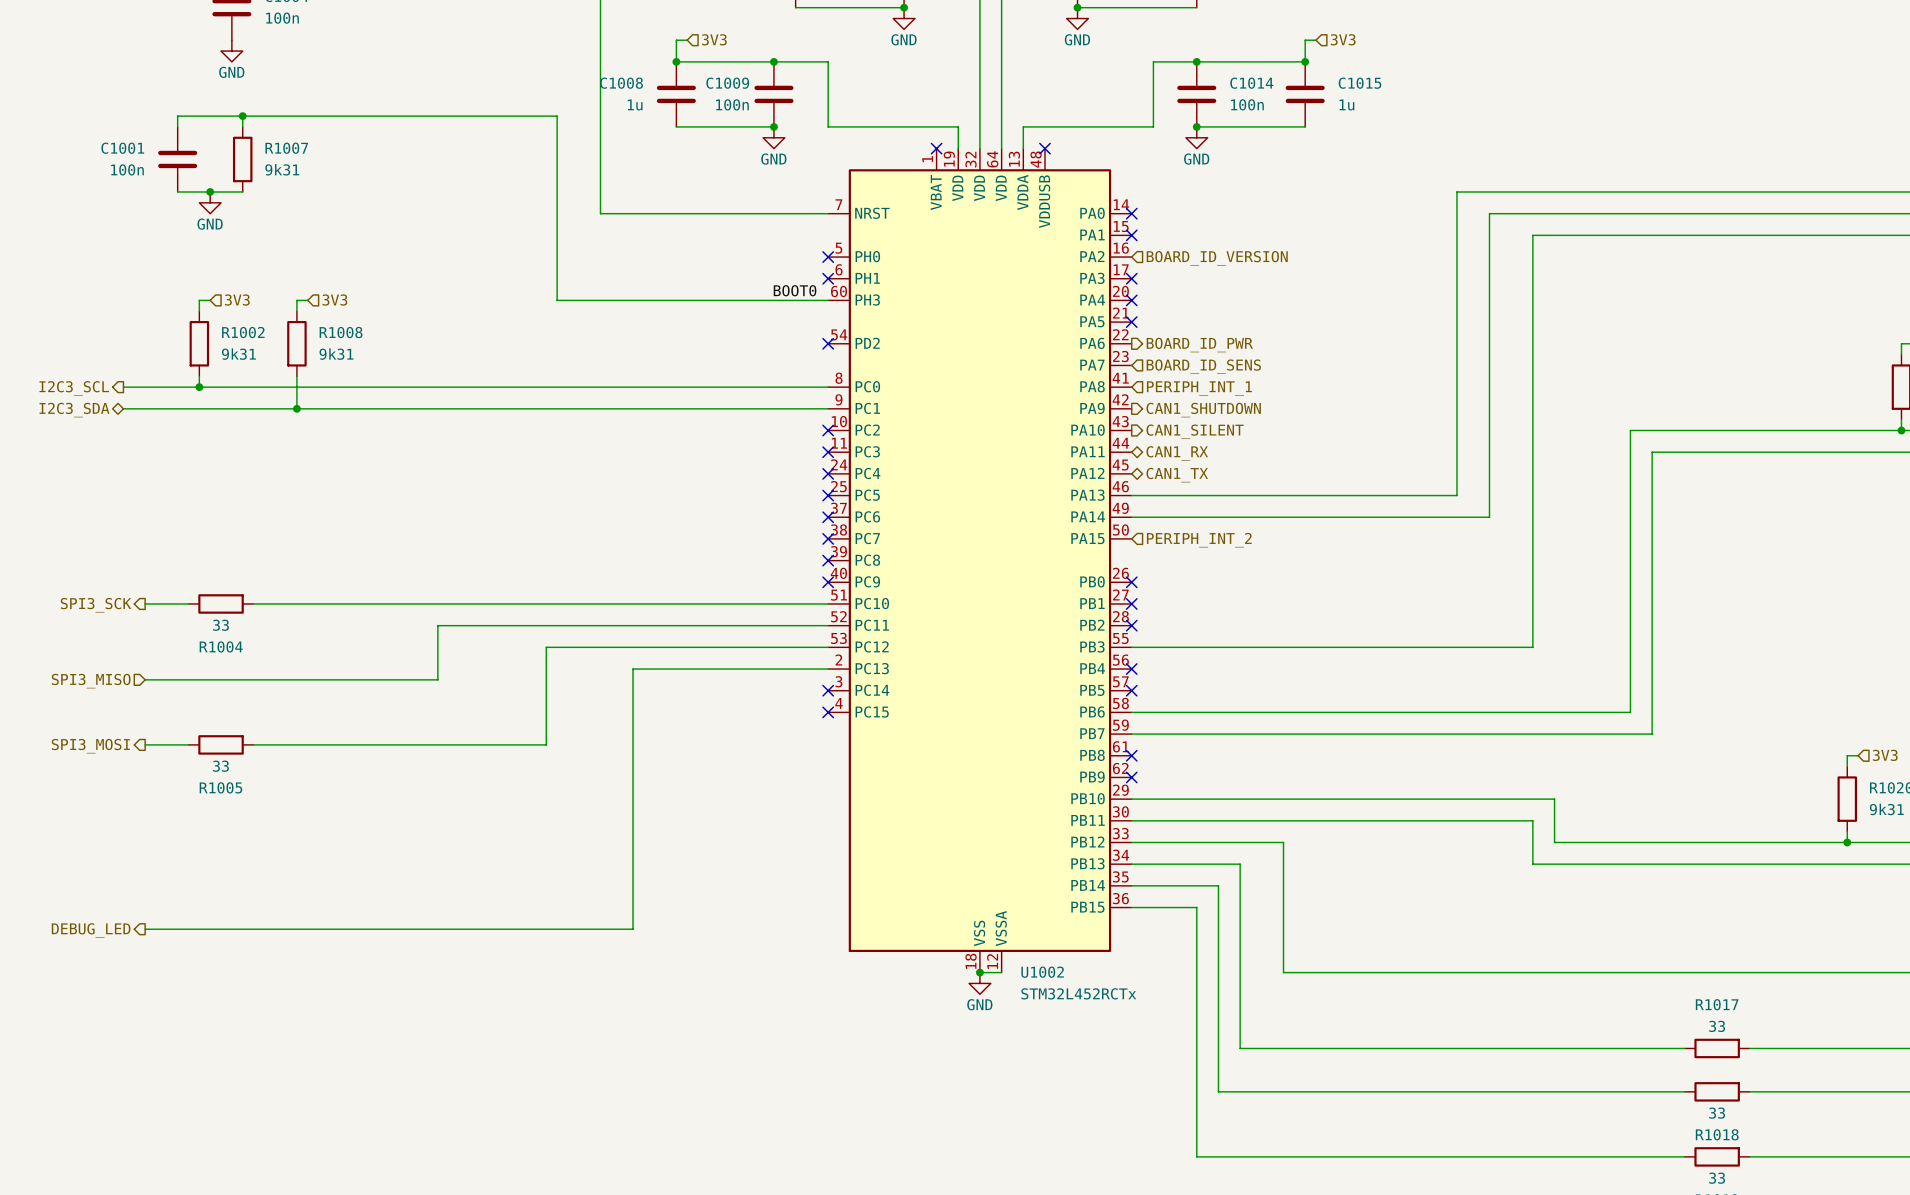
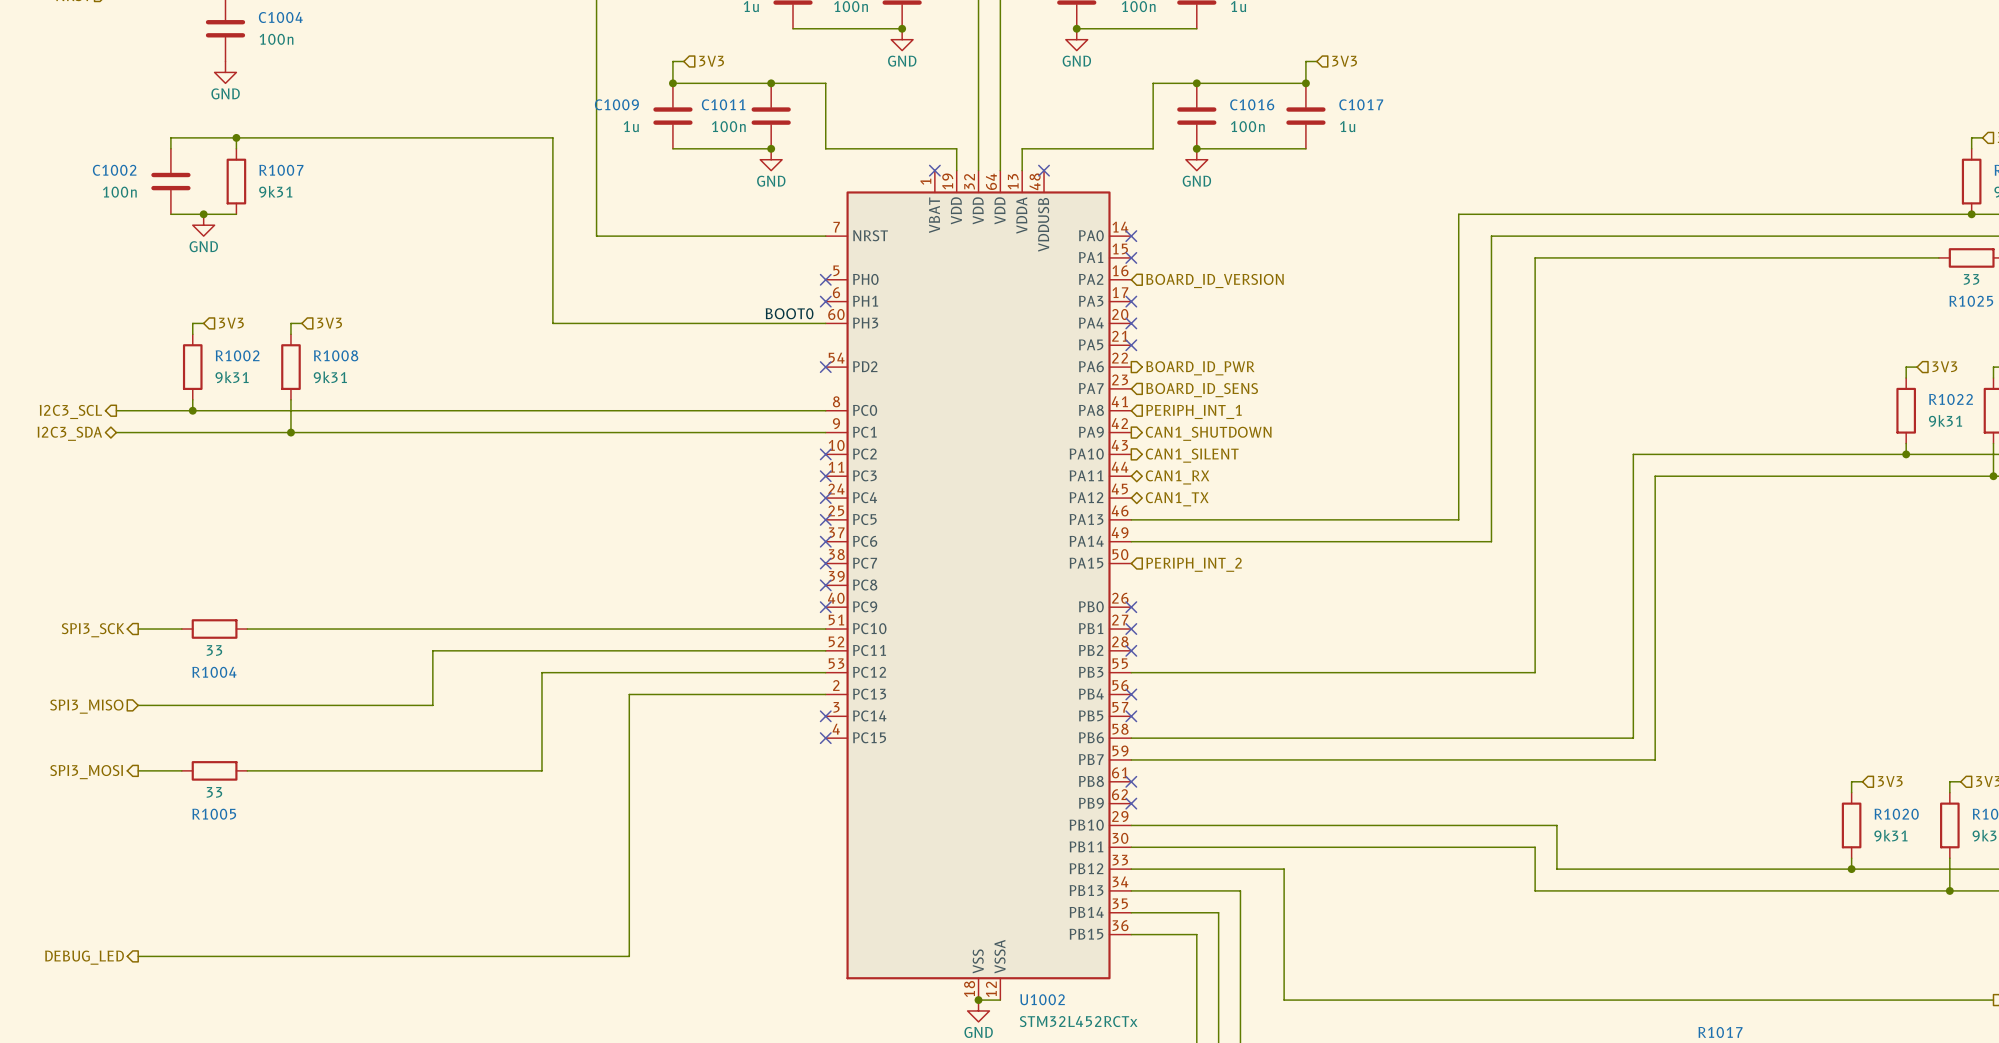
C1008 name: C1008 (621, 83) -> C1009 (616, 104)
C1009 name: C1009 (727, 83) -> C1011 (723, 104)
C1014 name: C1014 (1251, 83) -> C1016 (1252, 104)
C1015 name: C1015 (1360, 83) -> C1017 (1361, 104)
C1001 name: C1001 (122, 148) -> C1002 (114, 170)

